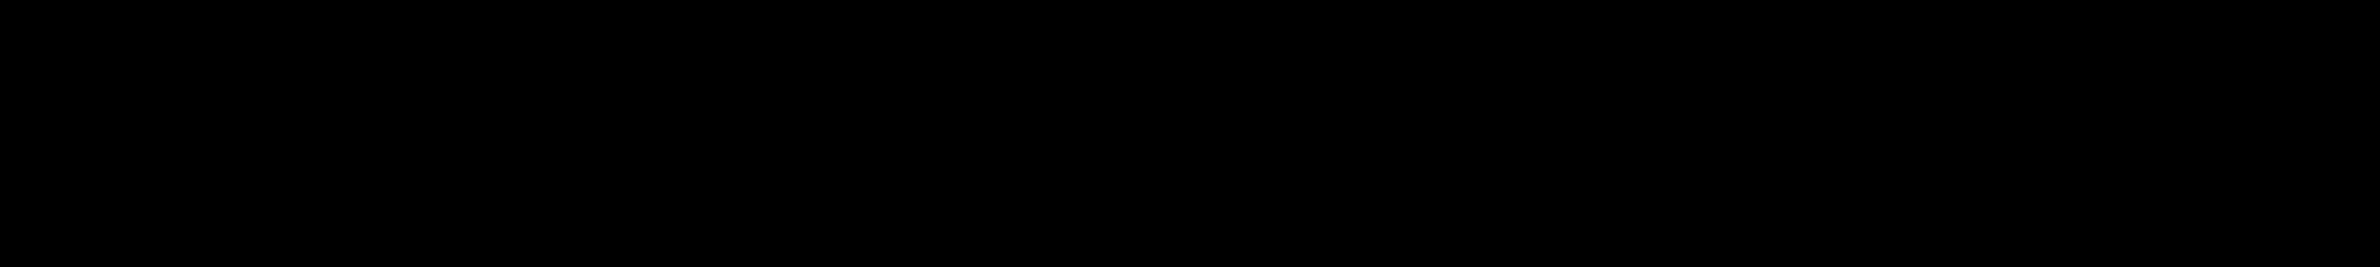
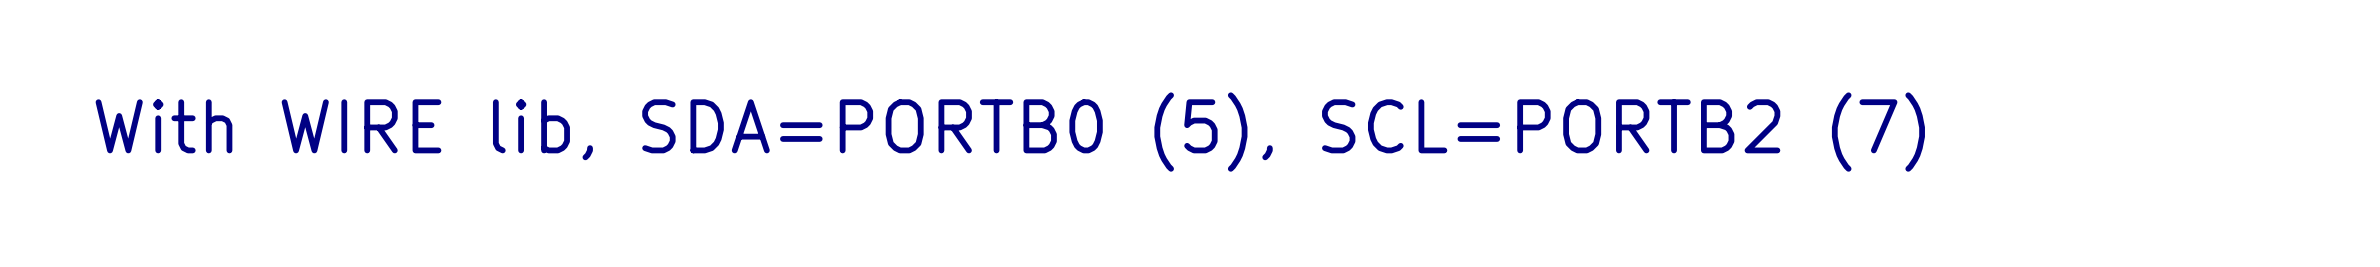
text: none -> With WIRE lib, SDA=PORTB0 (5), SCL=PORTB2 (7) (1010, 132)

